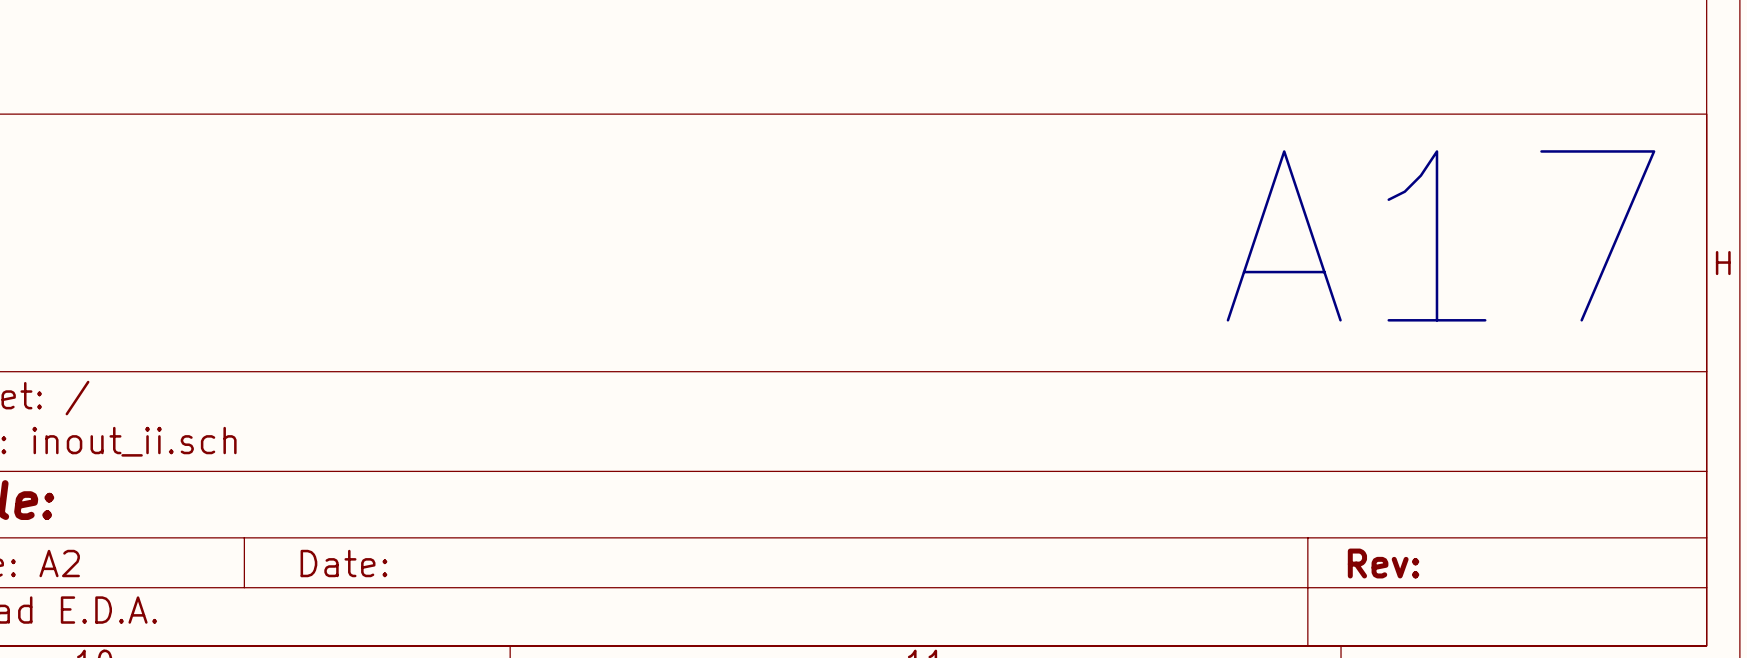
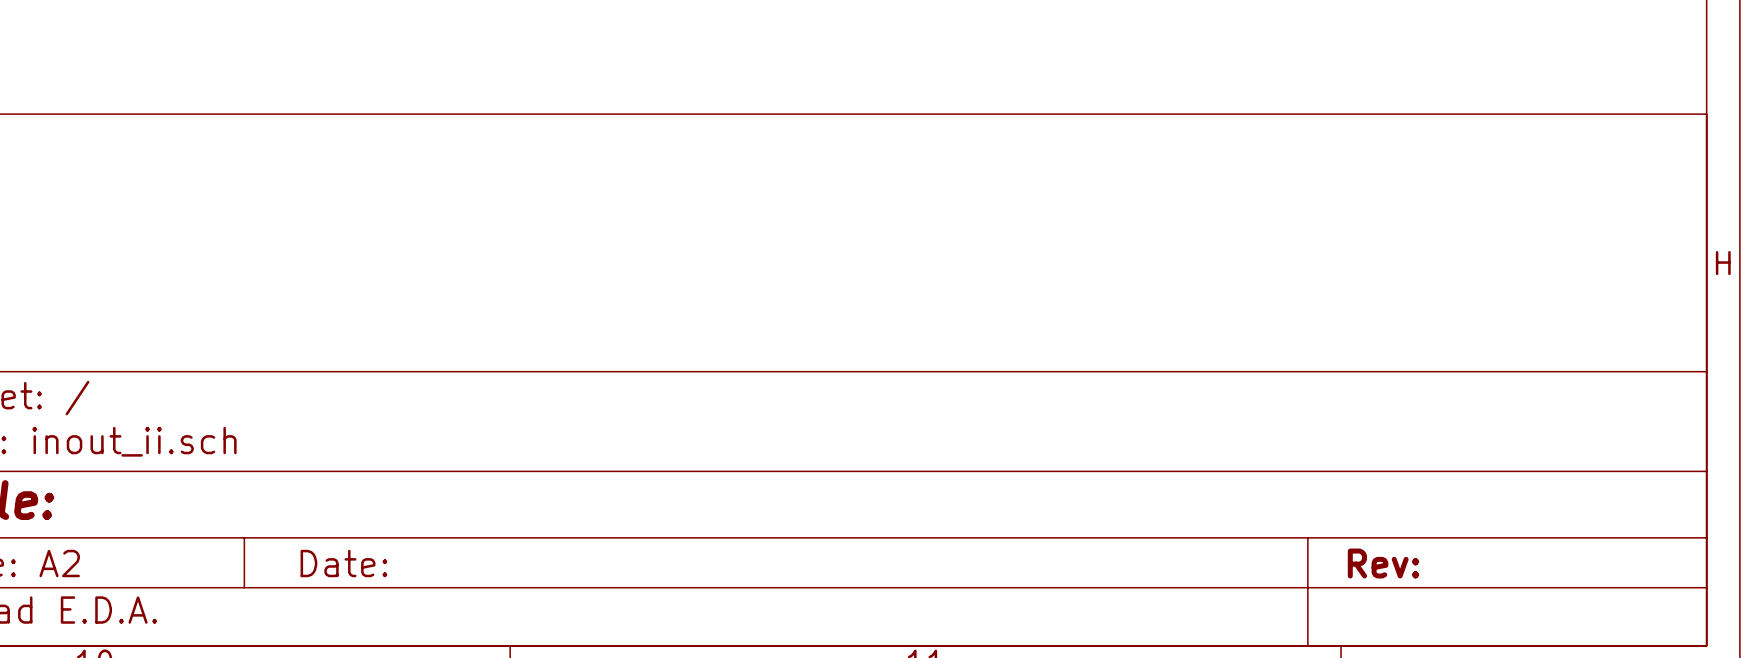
text: A17 (1441, 235) -> none

